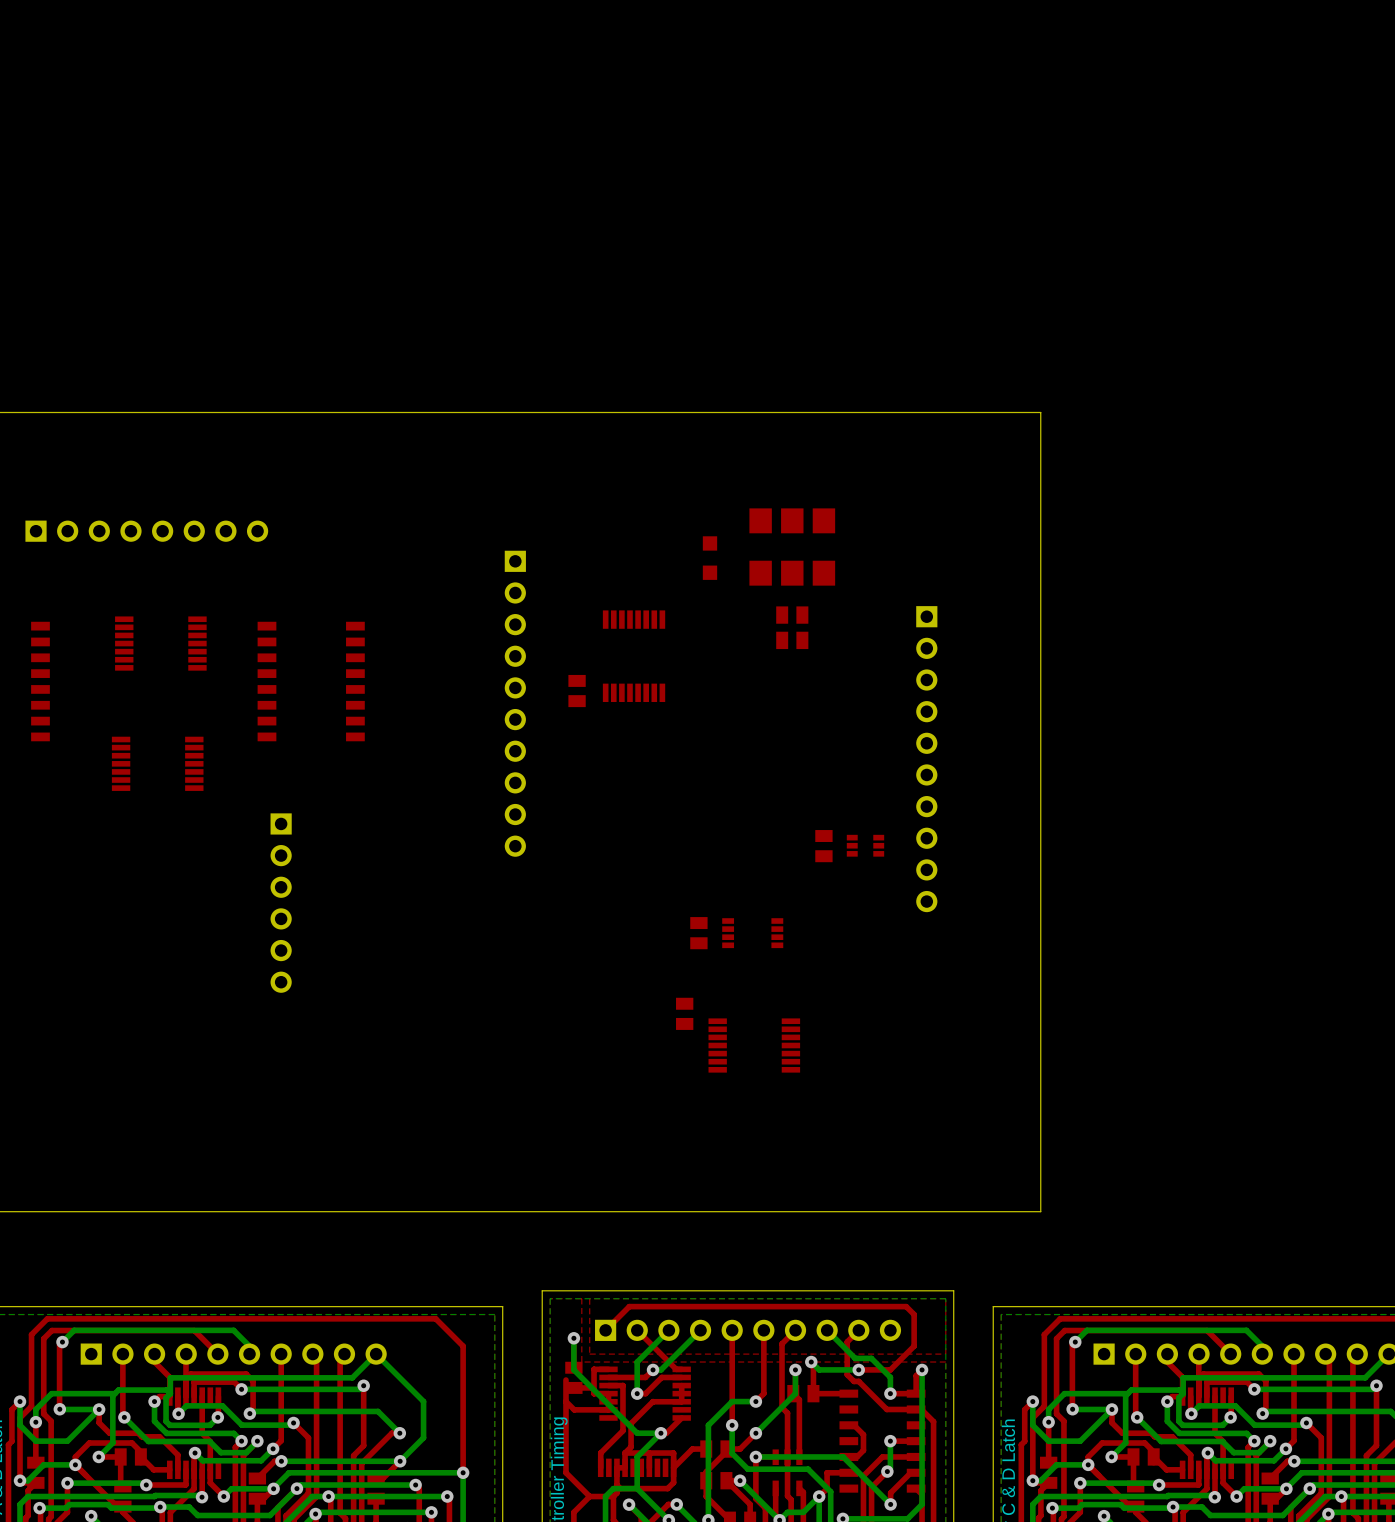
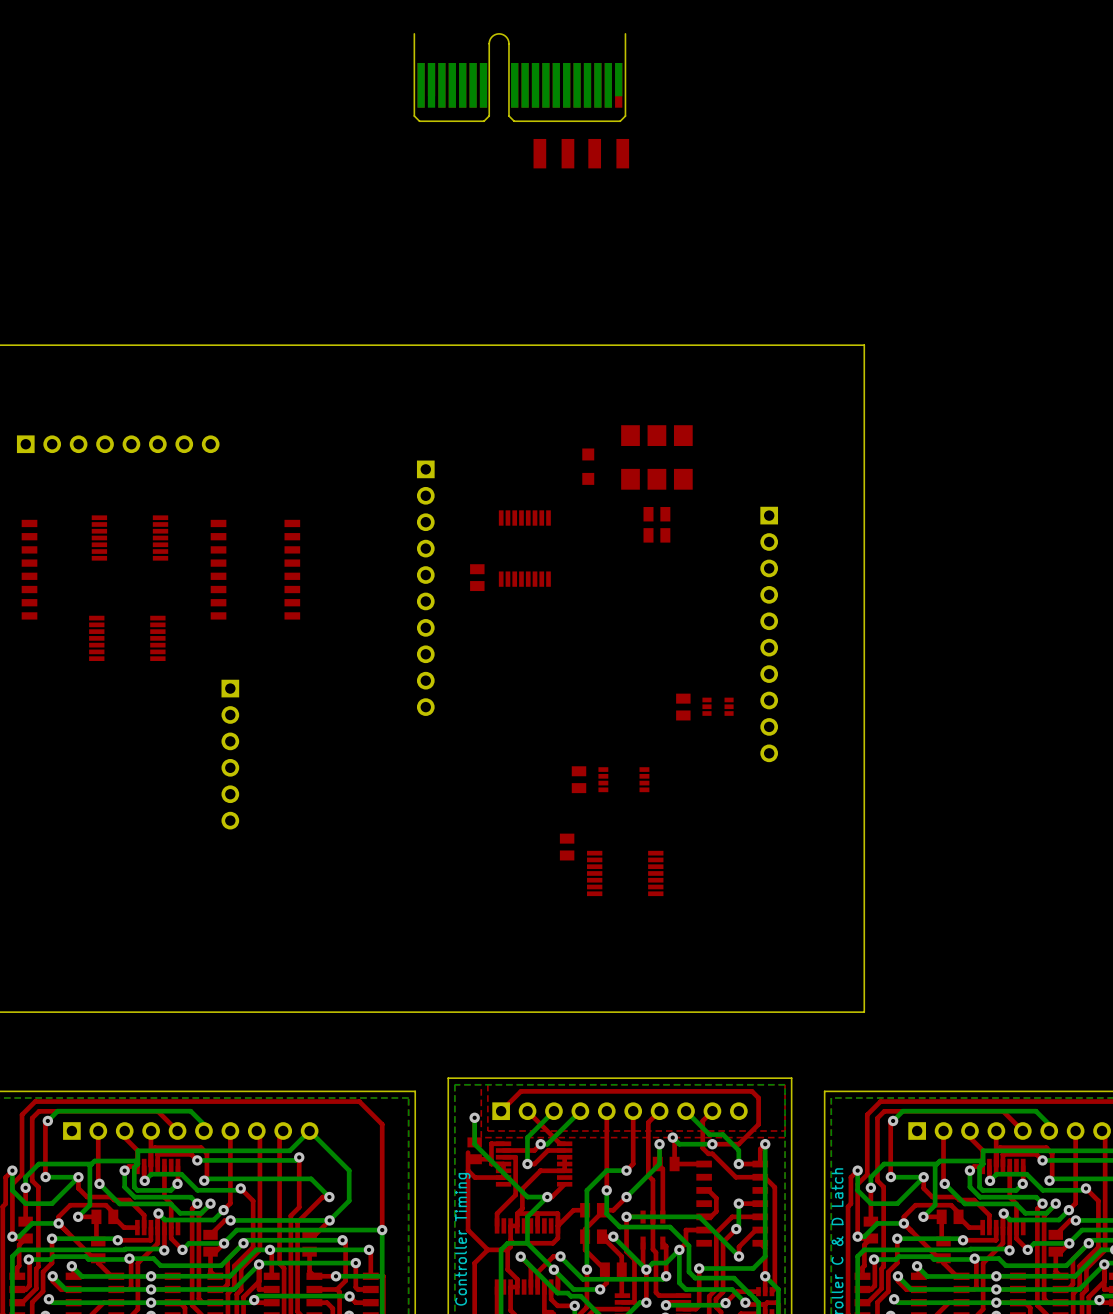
part: none -> (519, 77)
part: none -> (553, 153)
part: none -> (608, 153)

